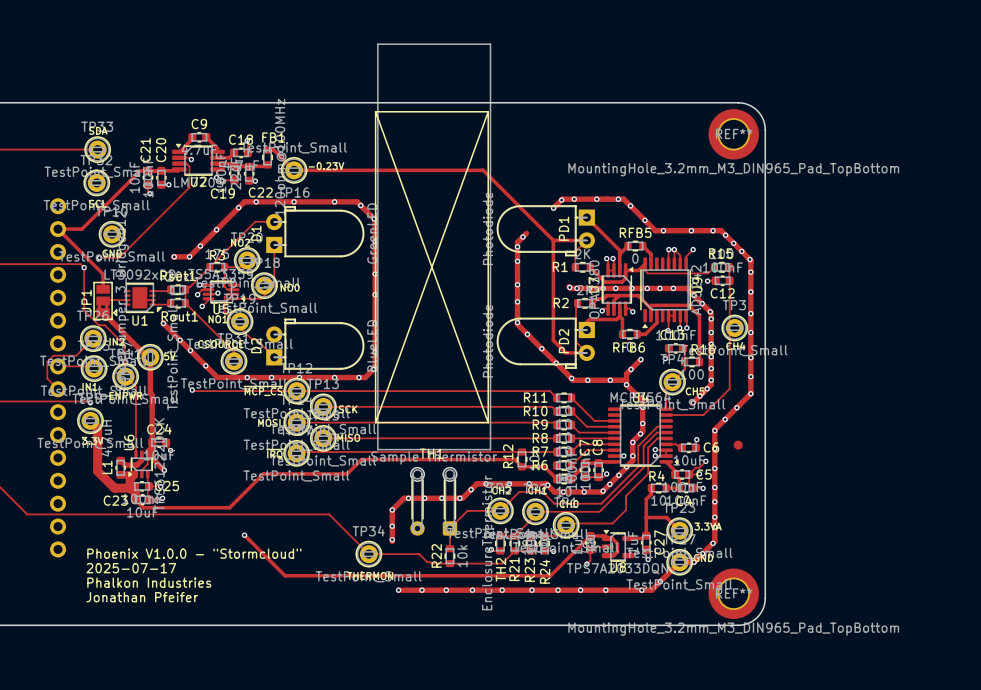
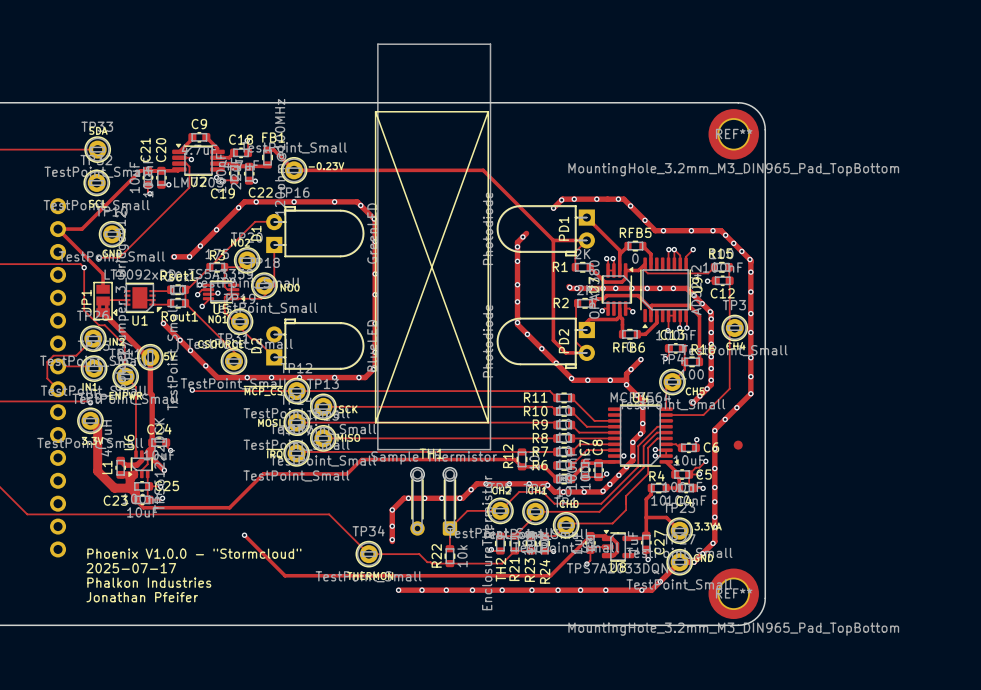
track: (618, 295) (613, 300) (613, 308) -> none

